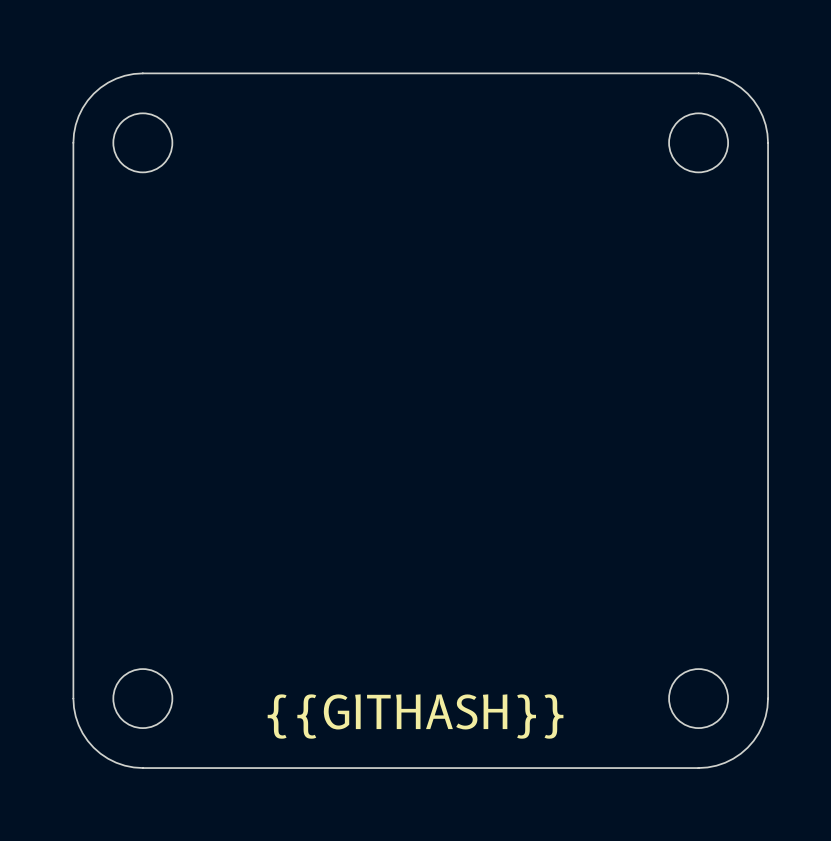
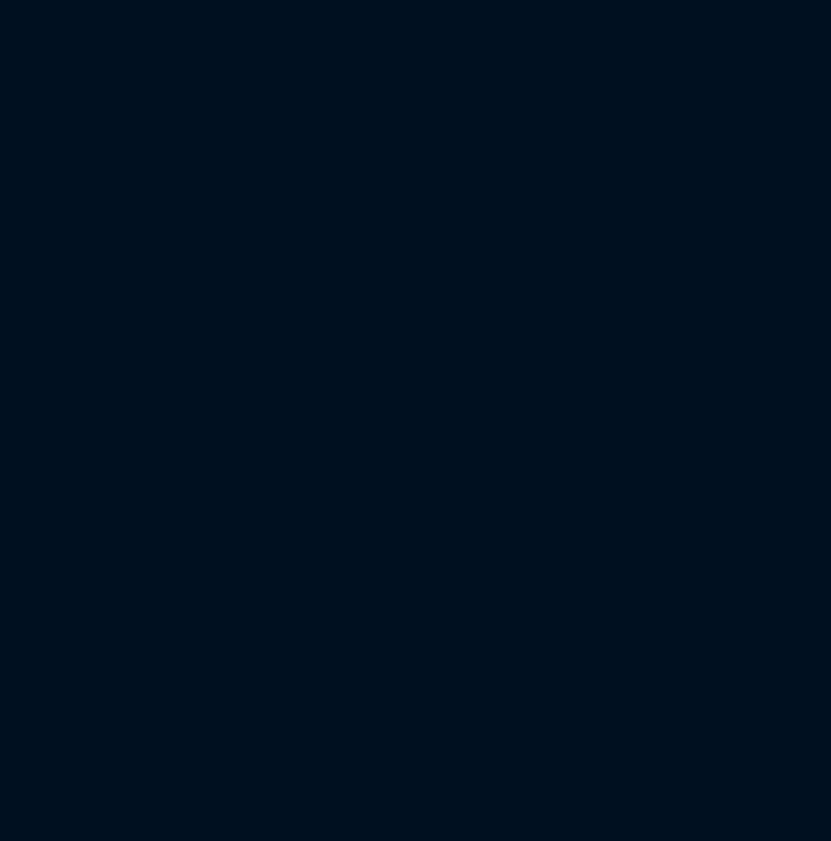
board edge: (142, 73) (698, 73) (725, 78) (747, 93) (762, 116) (768, 142) (768, 698) (762, 725) (747, 747) (725, 762) (698, 768) (142, 768) (116, 762) (93, 747) (78, 725) (73, 698) (73, 133) (82, 108) (93, 93) (116, 78) (142, 73) -> none
round board edge: [112, 112, 174, 174] -> none
round board edge: [668, 112, 729, 174] -> none
round board edge: [112, 668, 174, 729] -> none
round board edge: [668, 668, 729, 729] -> none
text: {{GITHASH}} (415, 716) -> none

